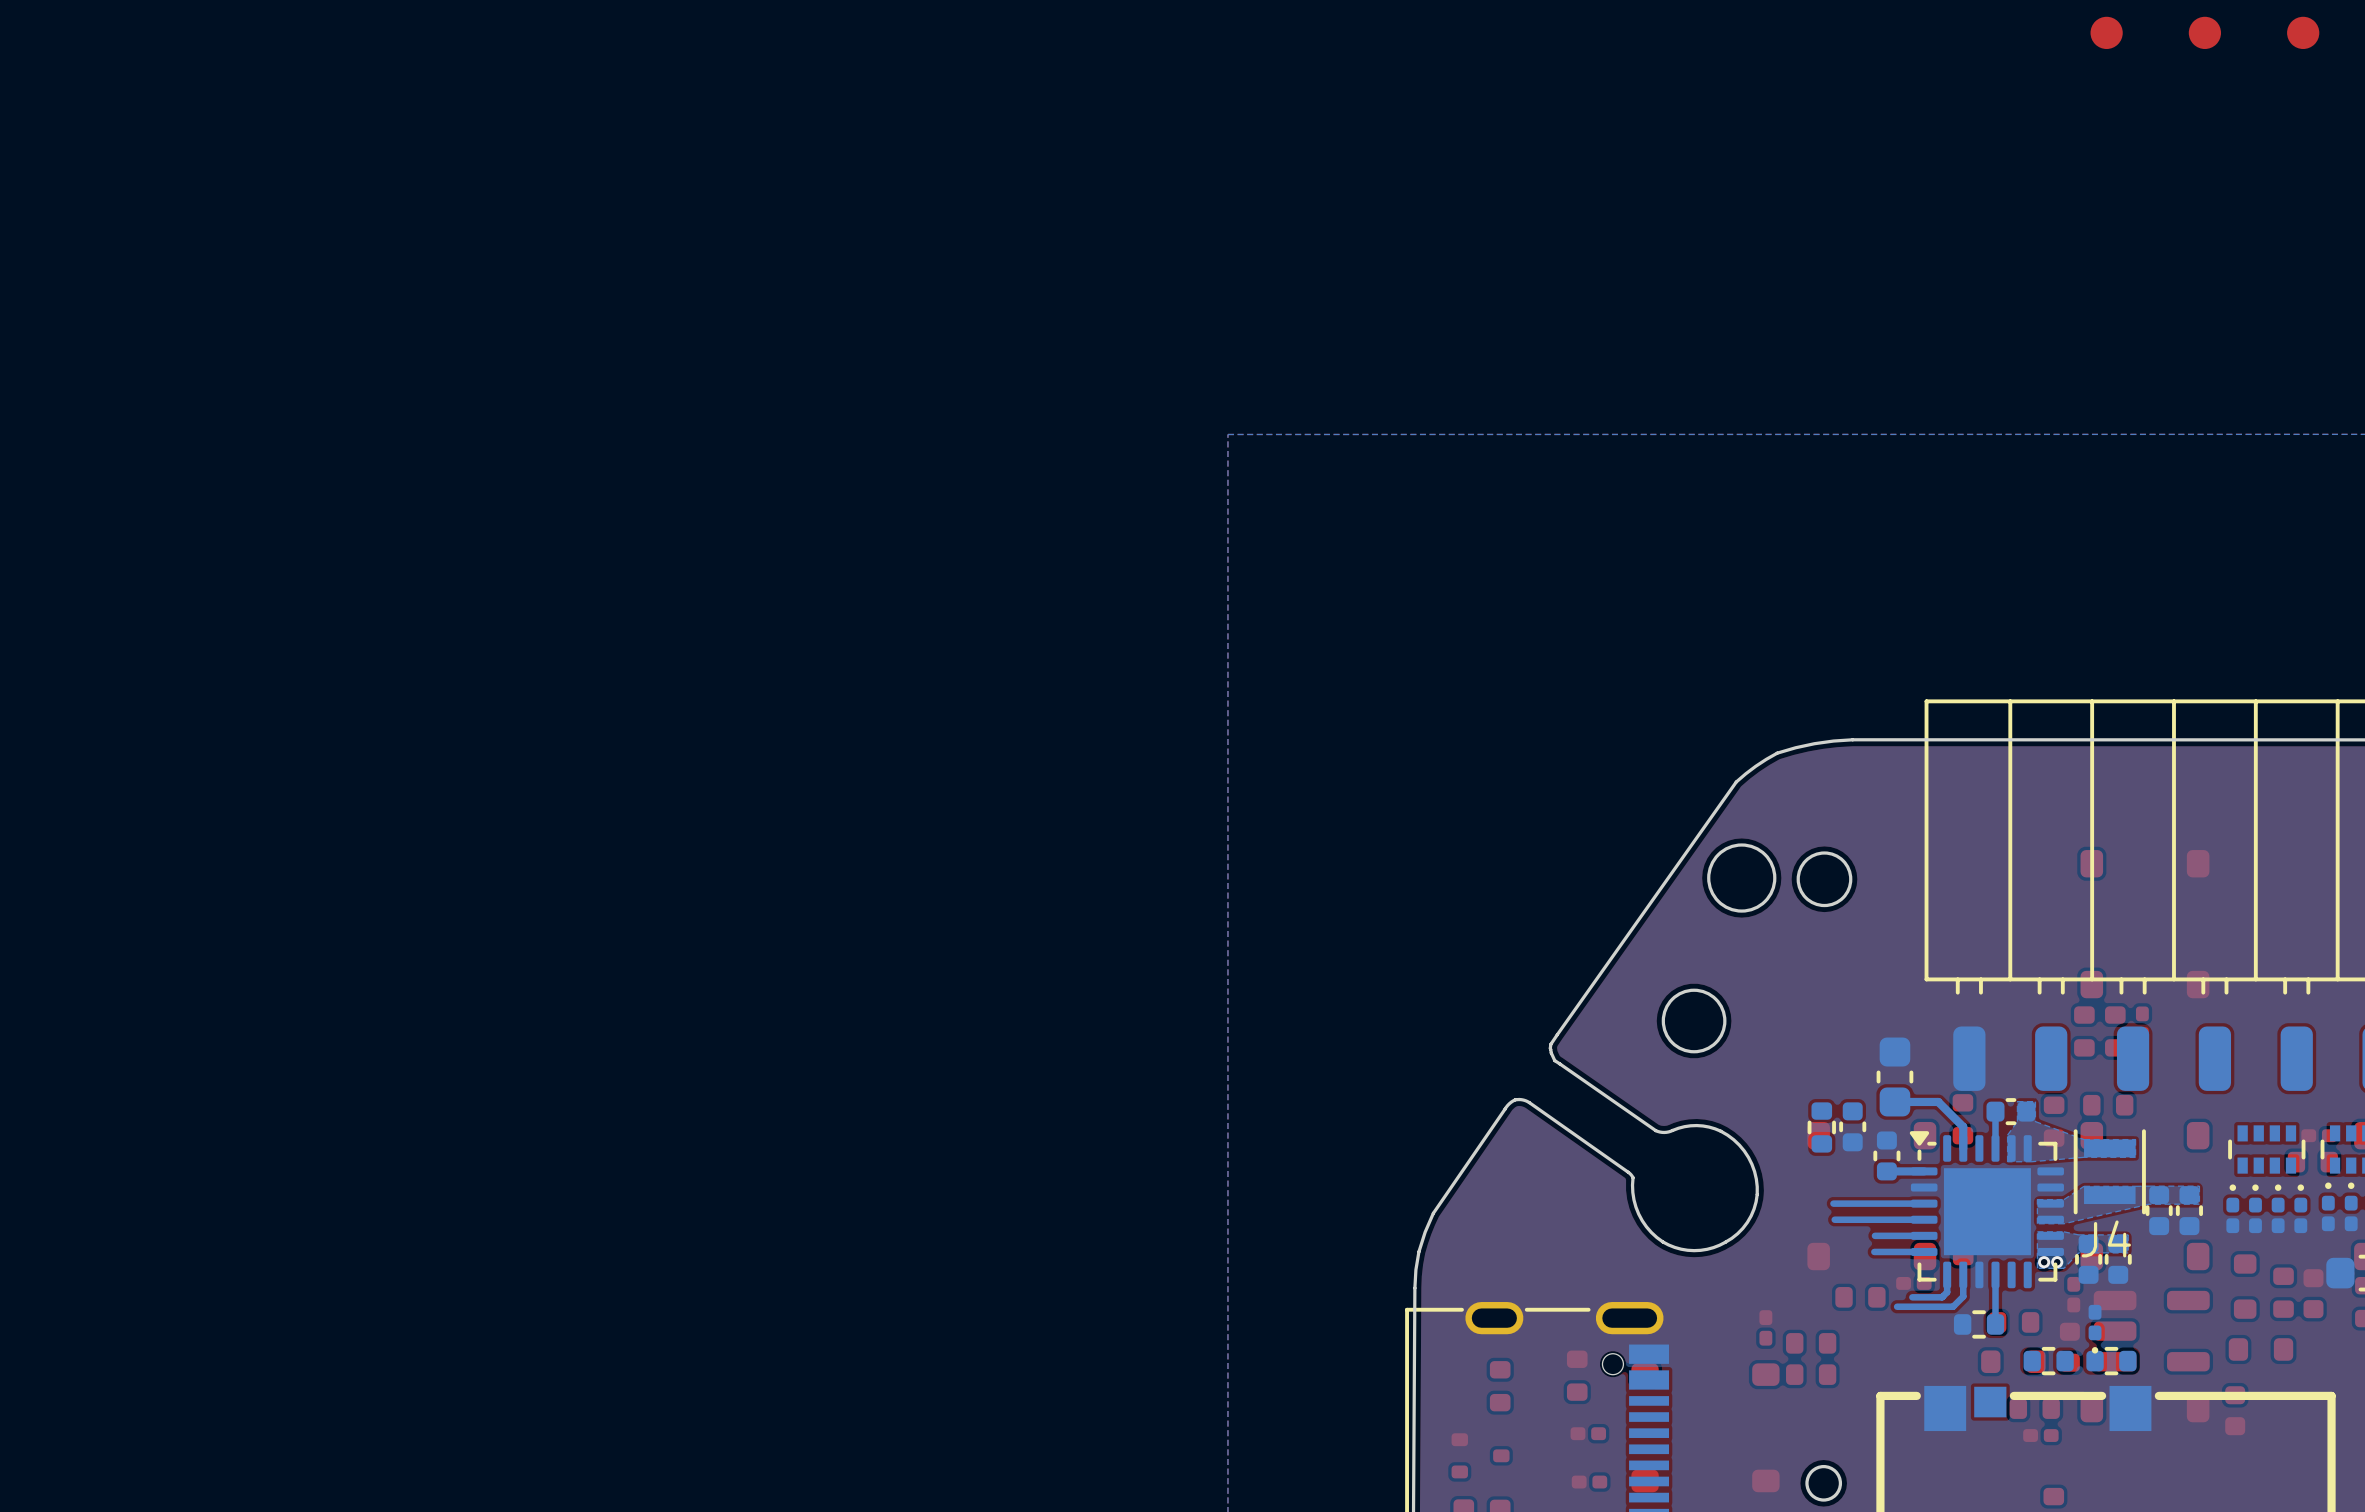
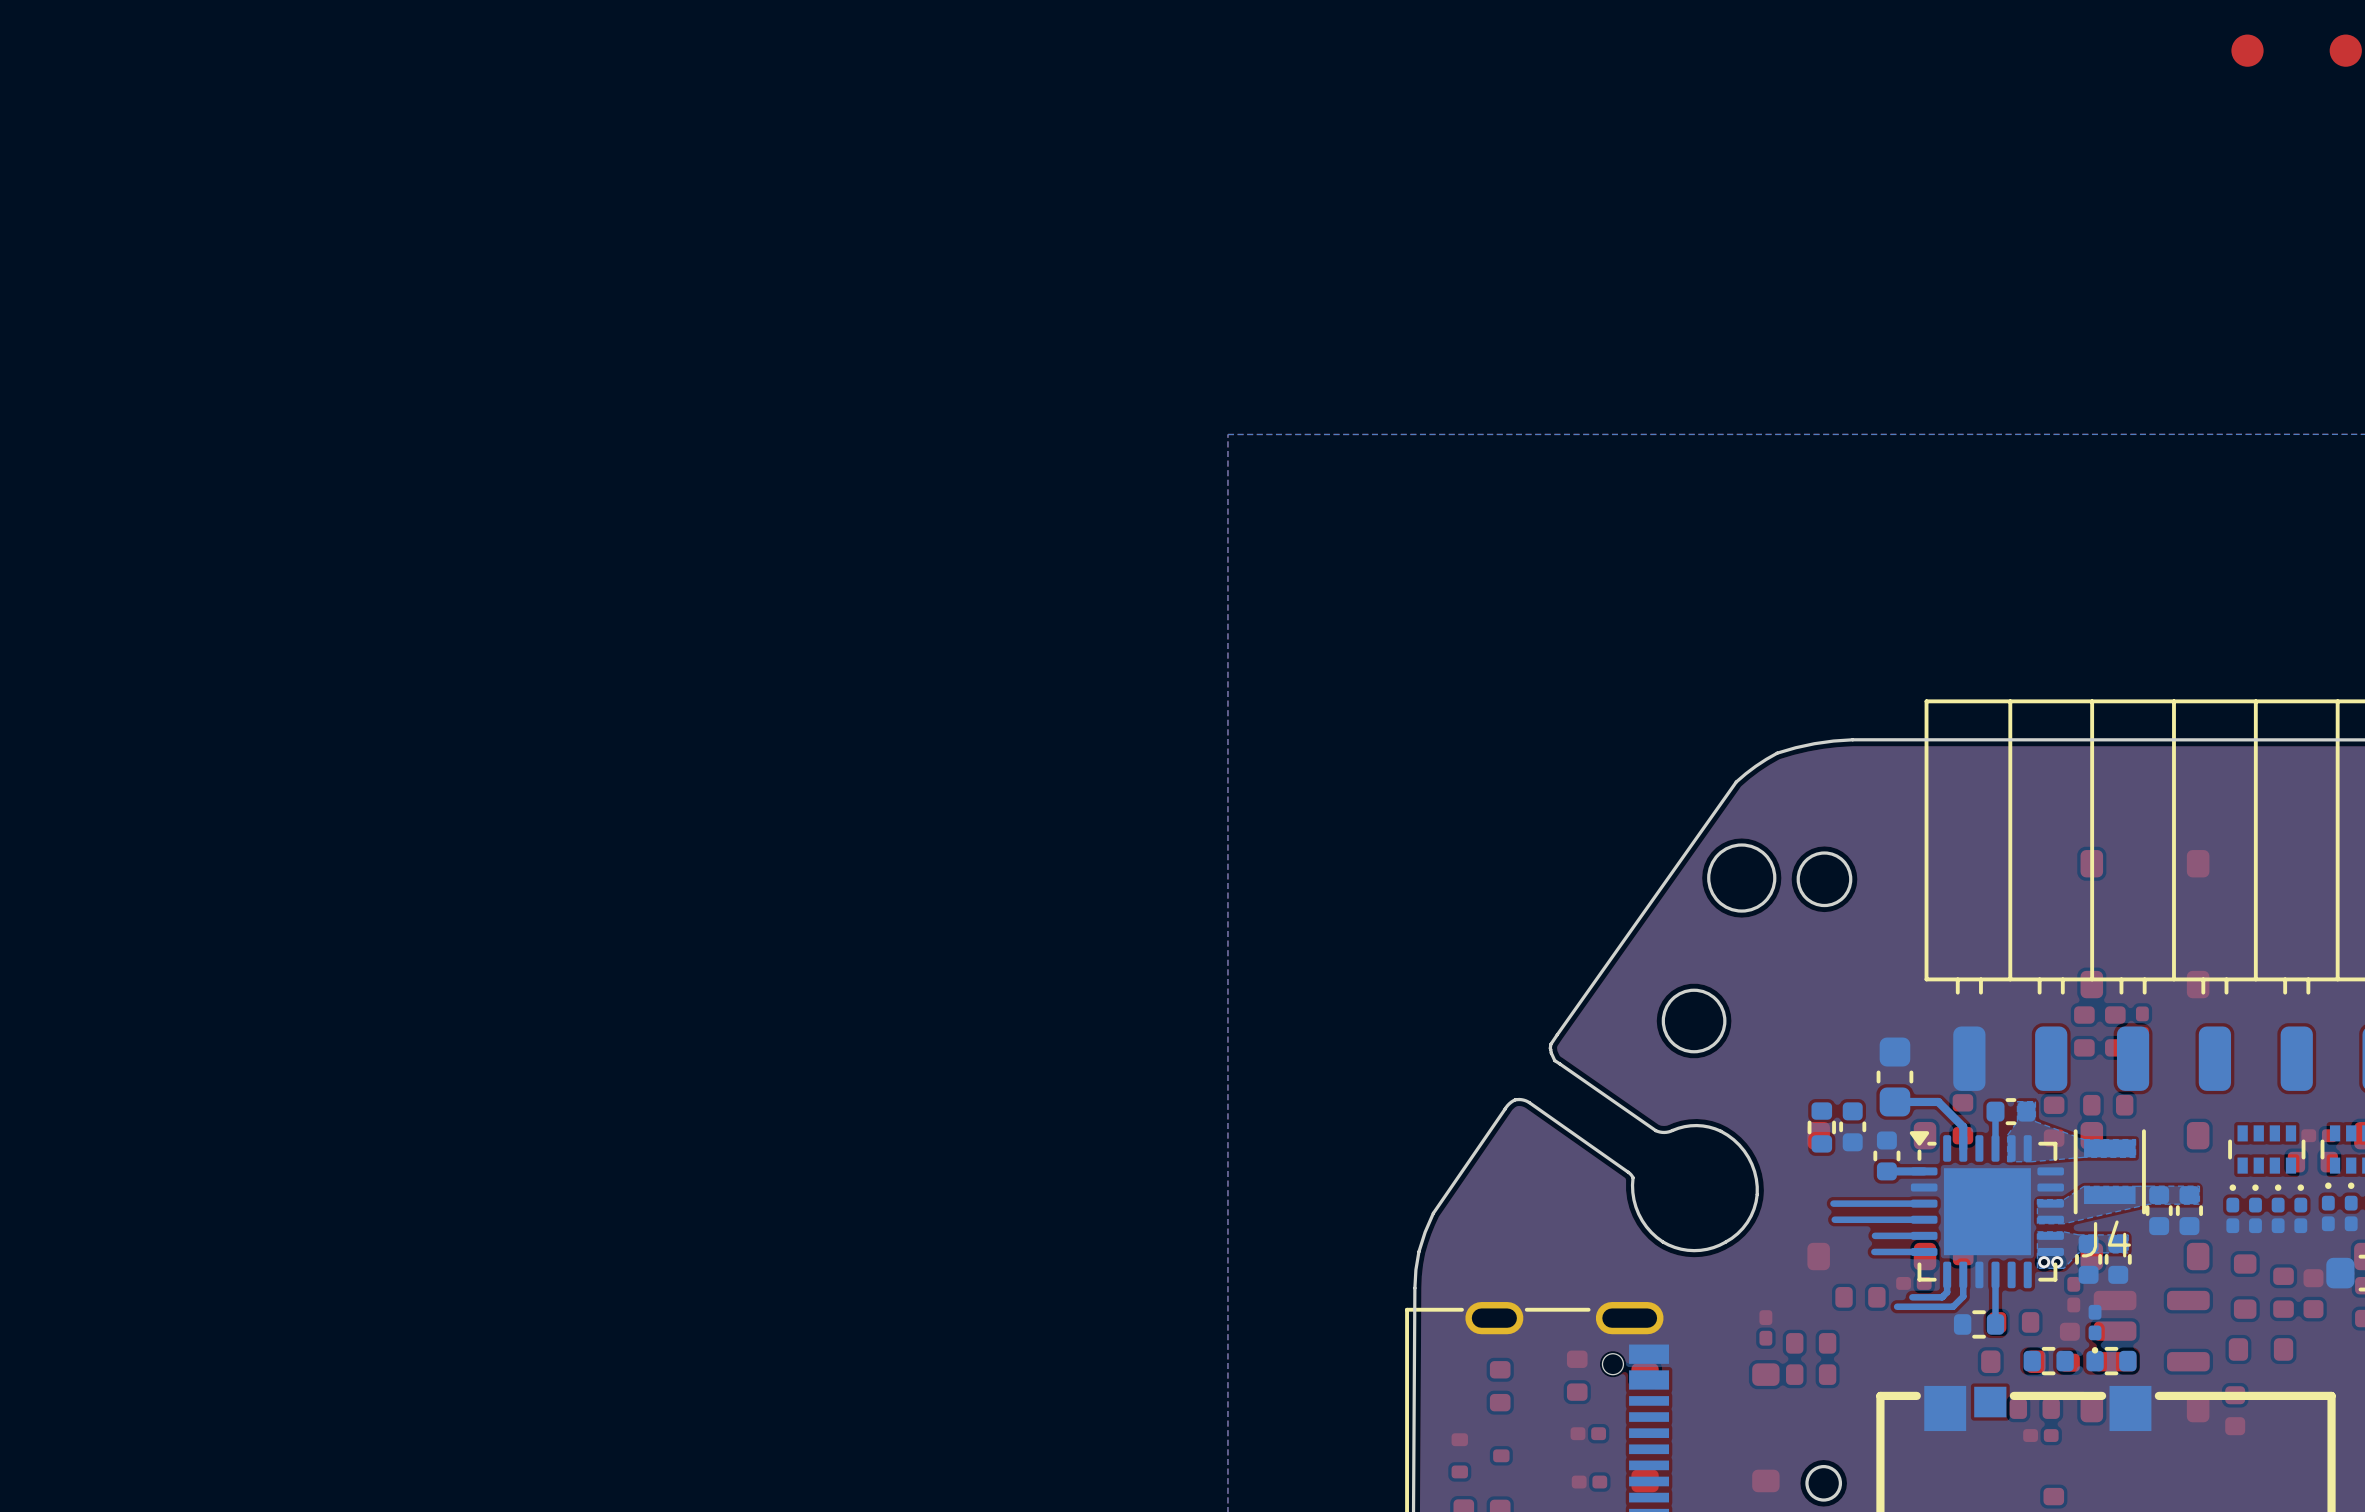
part: (2106, 32) -> none
part: (2204, 32) -> none
part: (2303, 32) -> none
part: none -> (2247, 50)
part: none -> (2345, 50)

